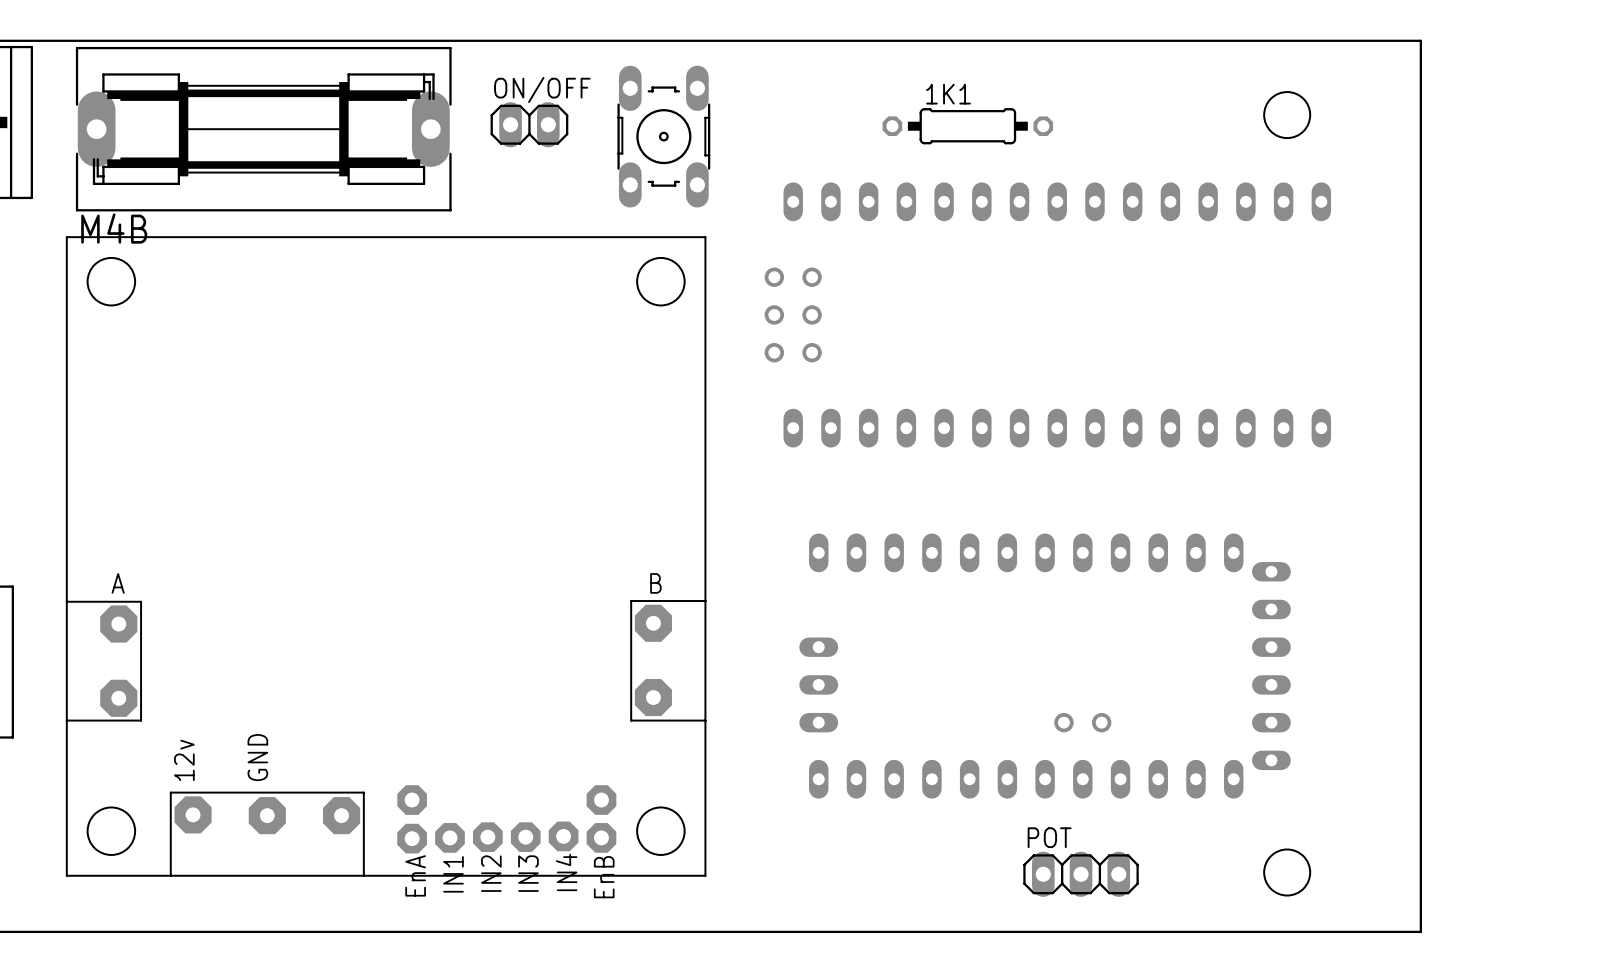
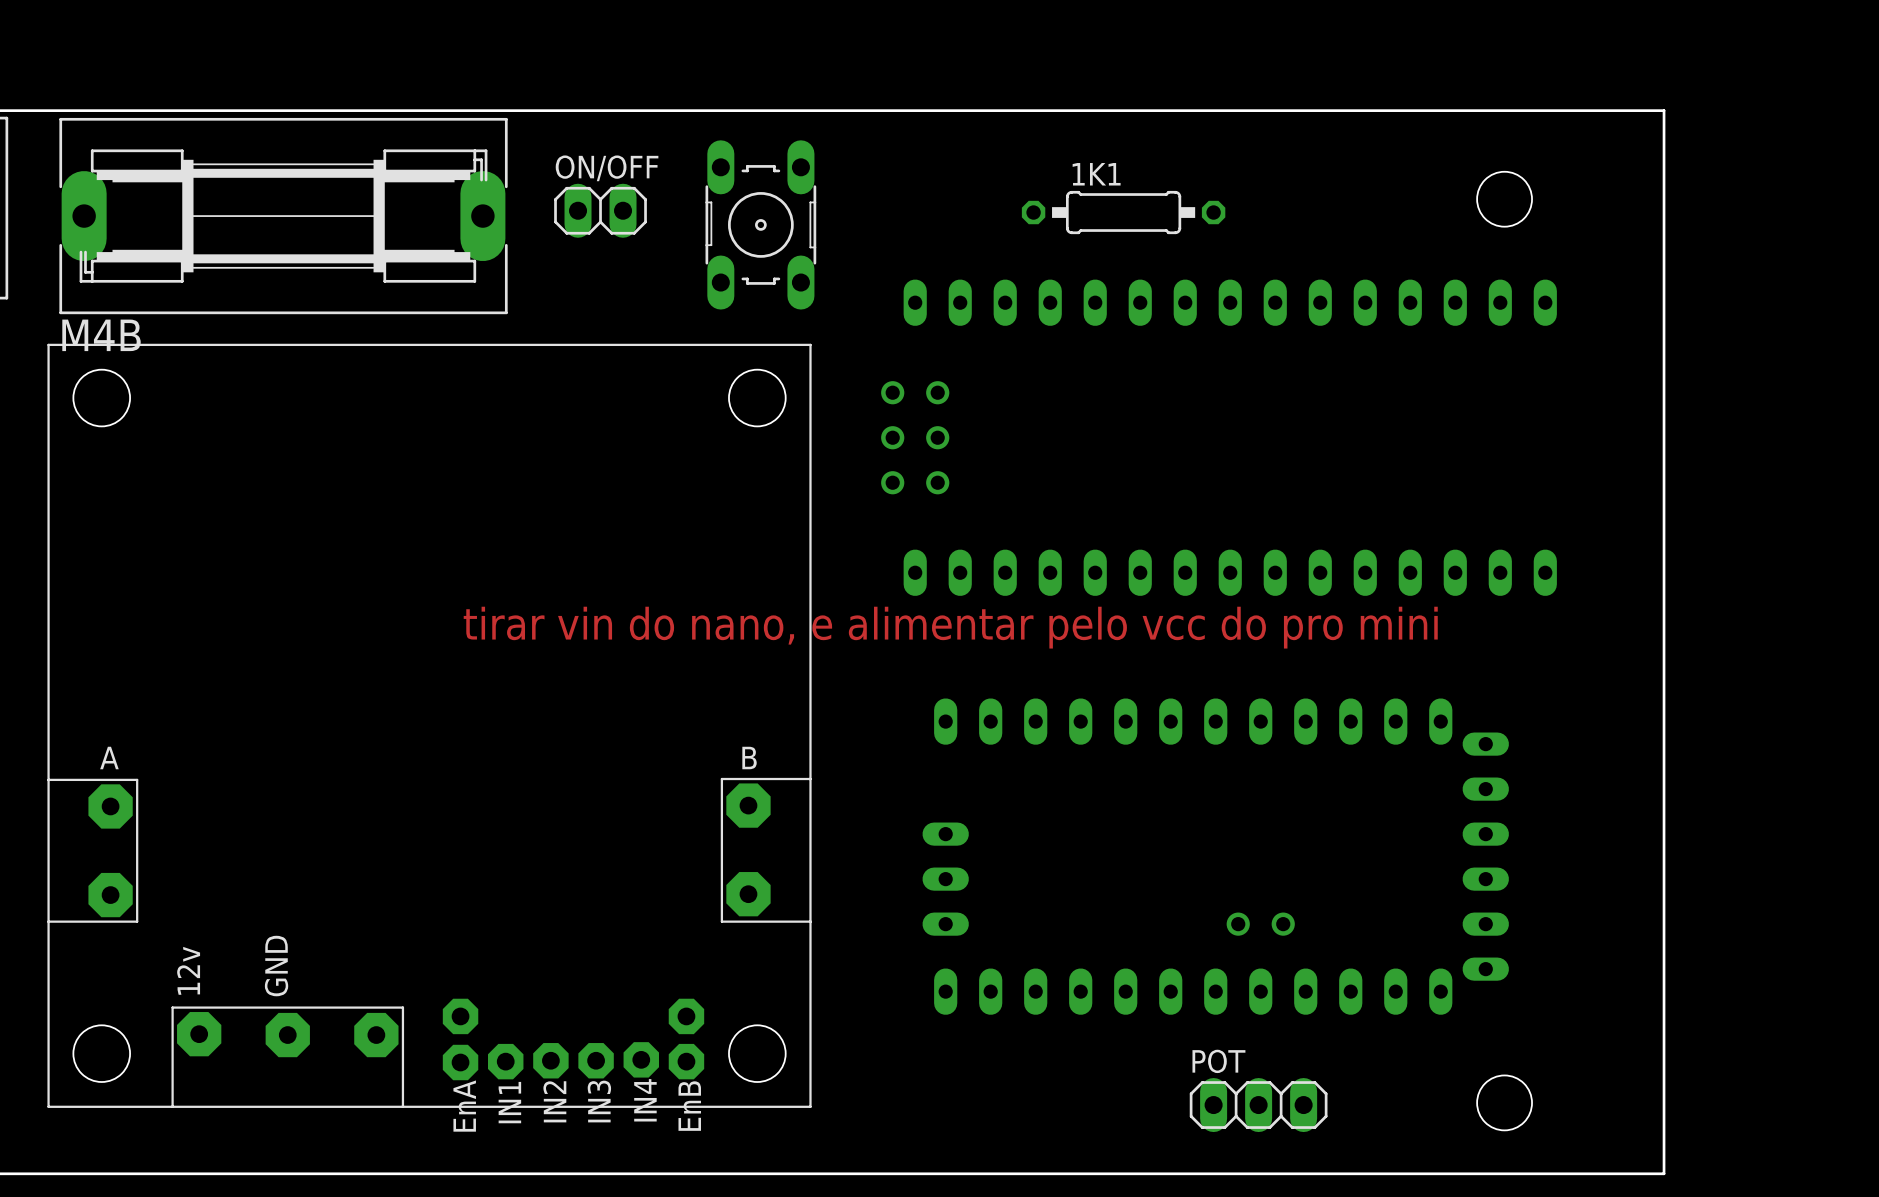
text: none -> tirar vin do nano, e alimentar pelo vcc do pro mini (950, 627)

